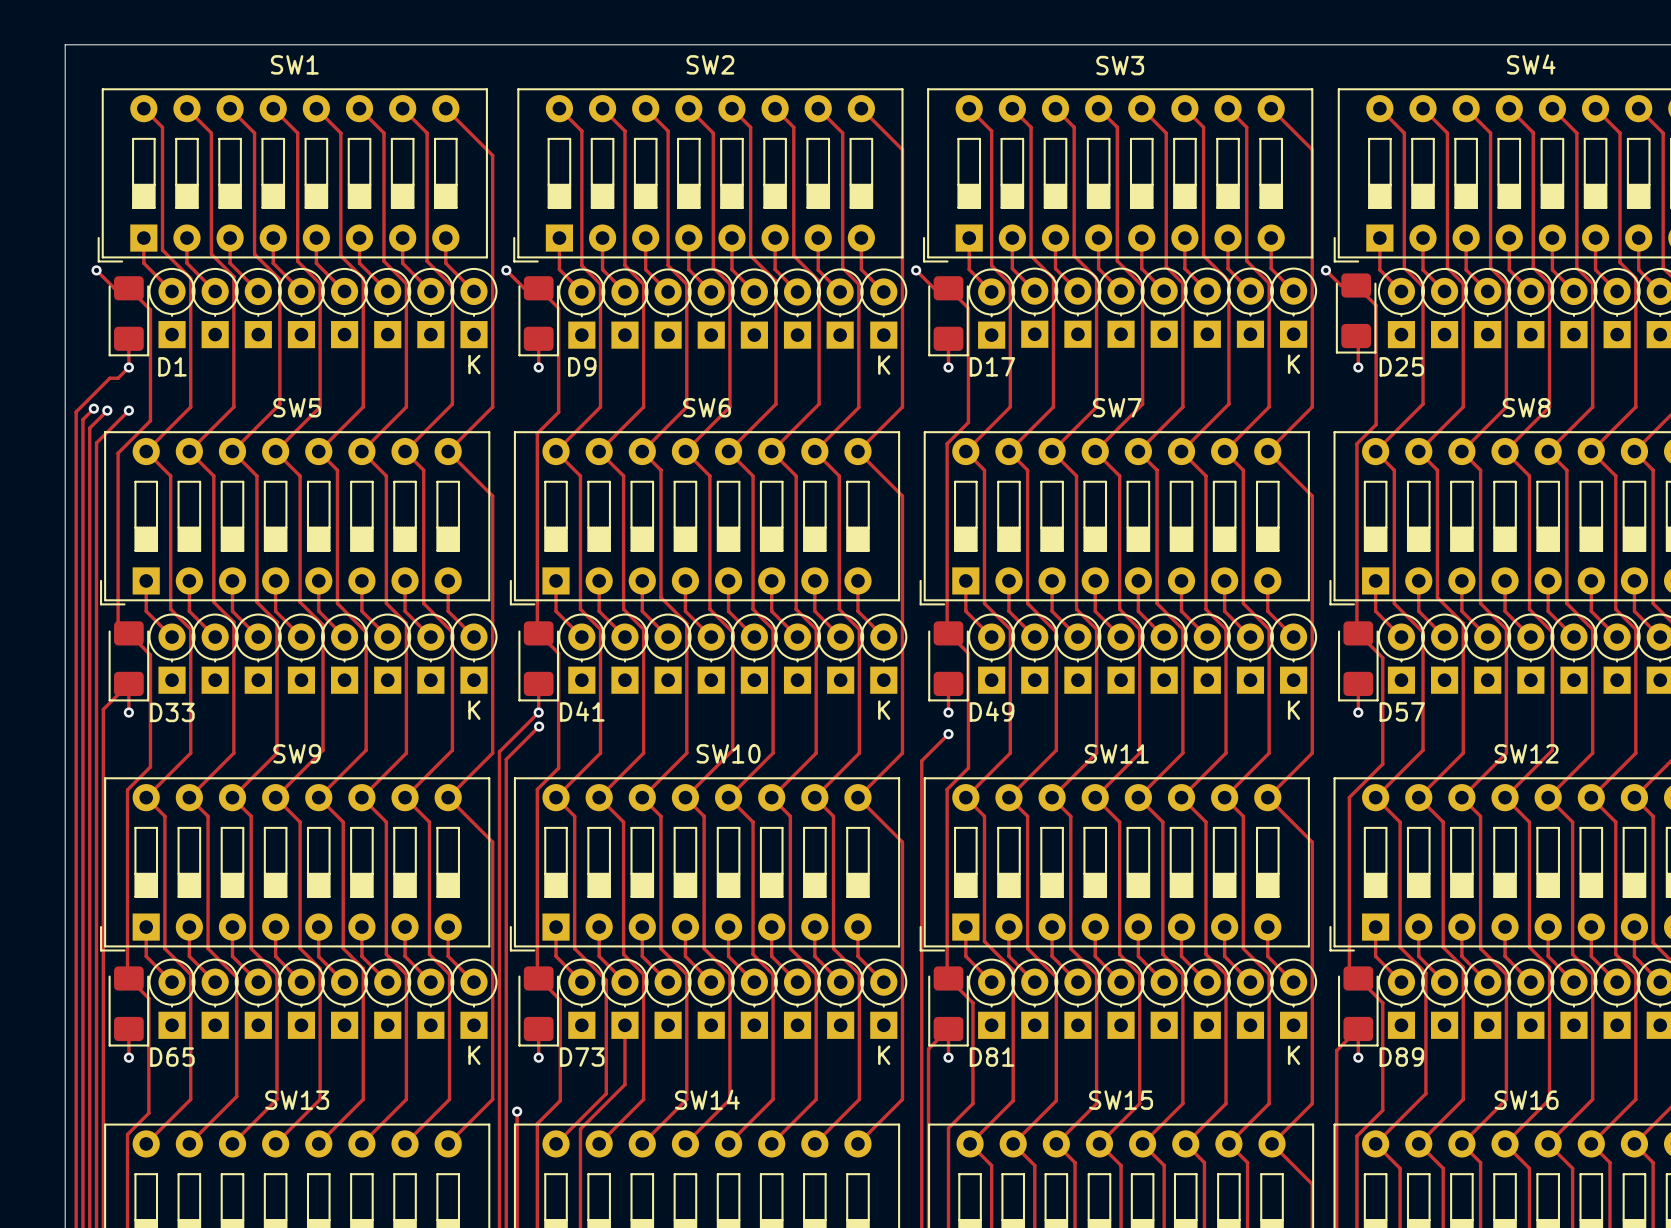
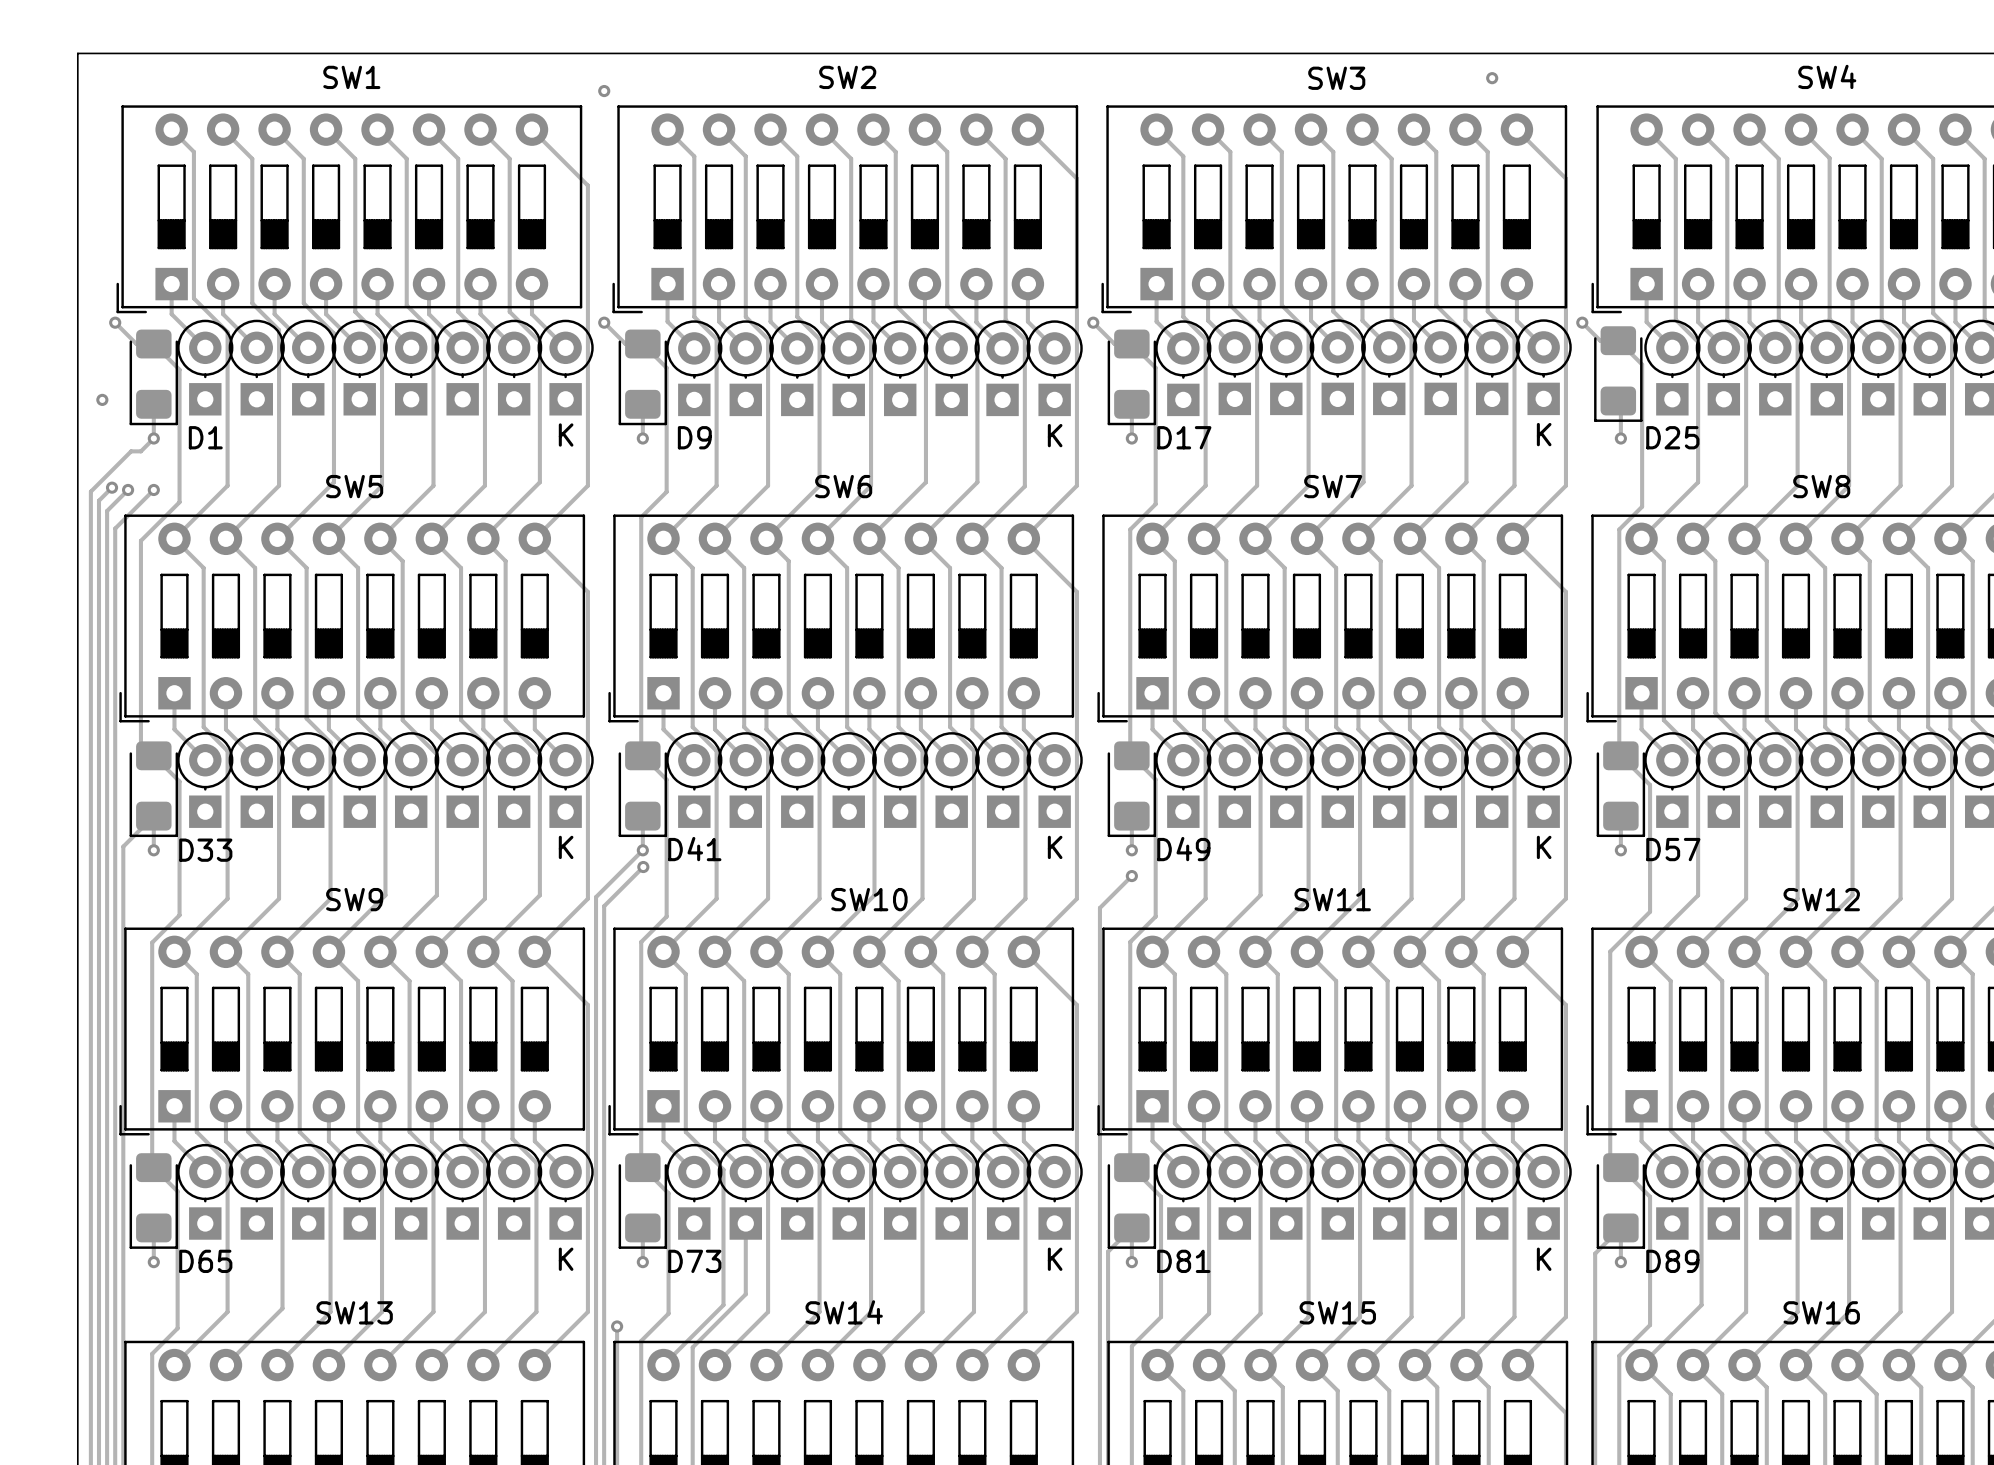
via: none -> (1492, 78)
via: none -> (604, 91)
via: none -> (102, 399)

